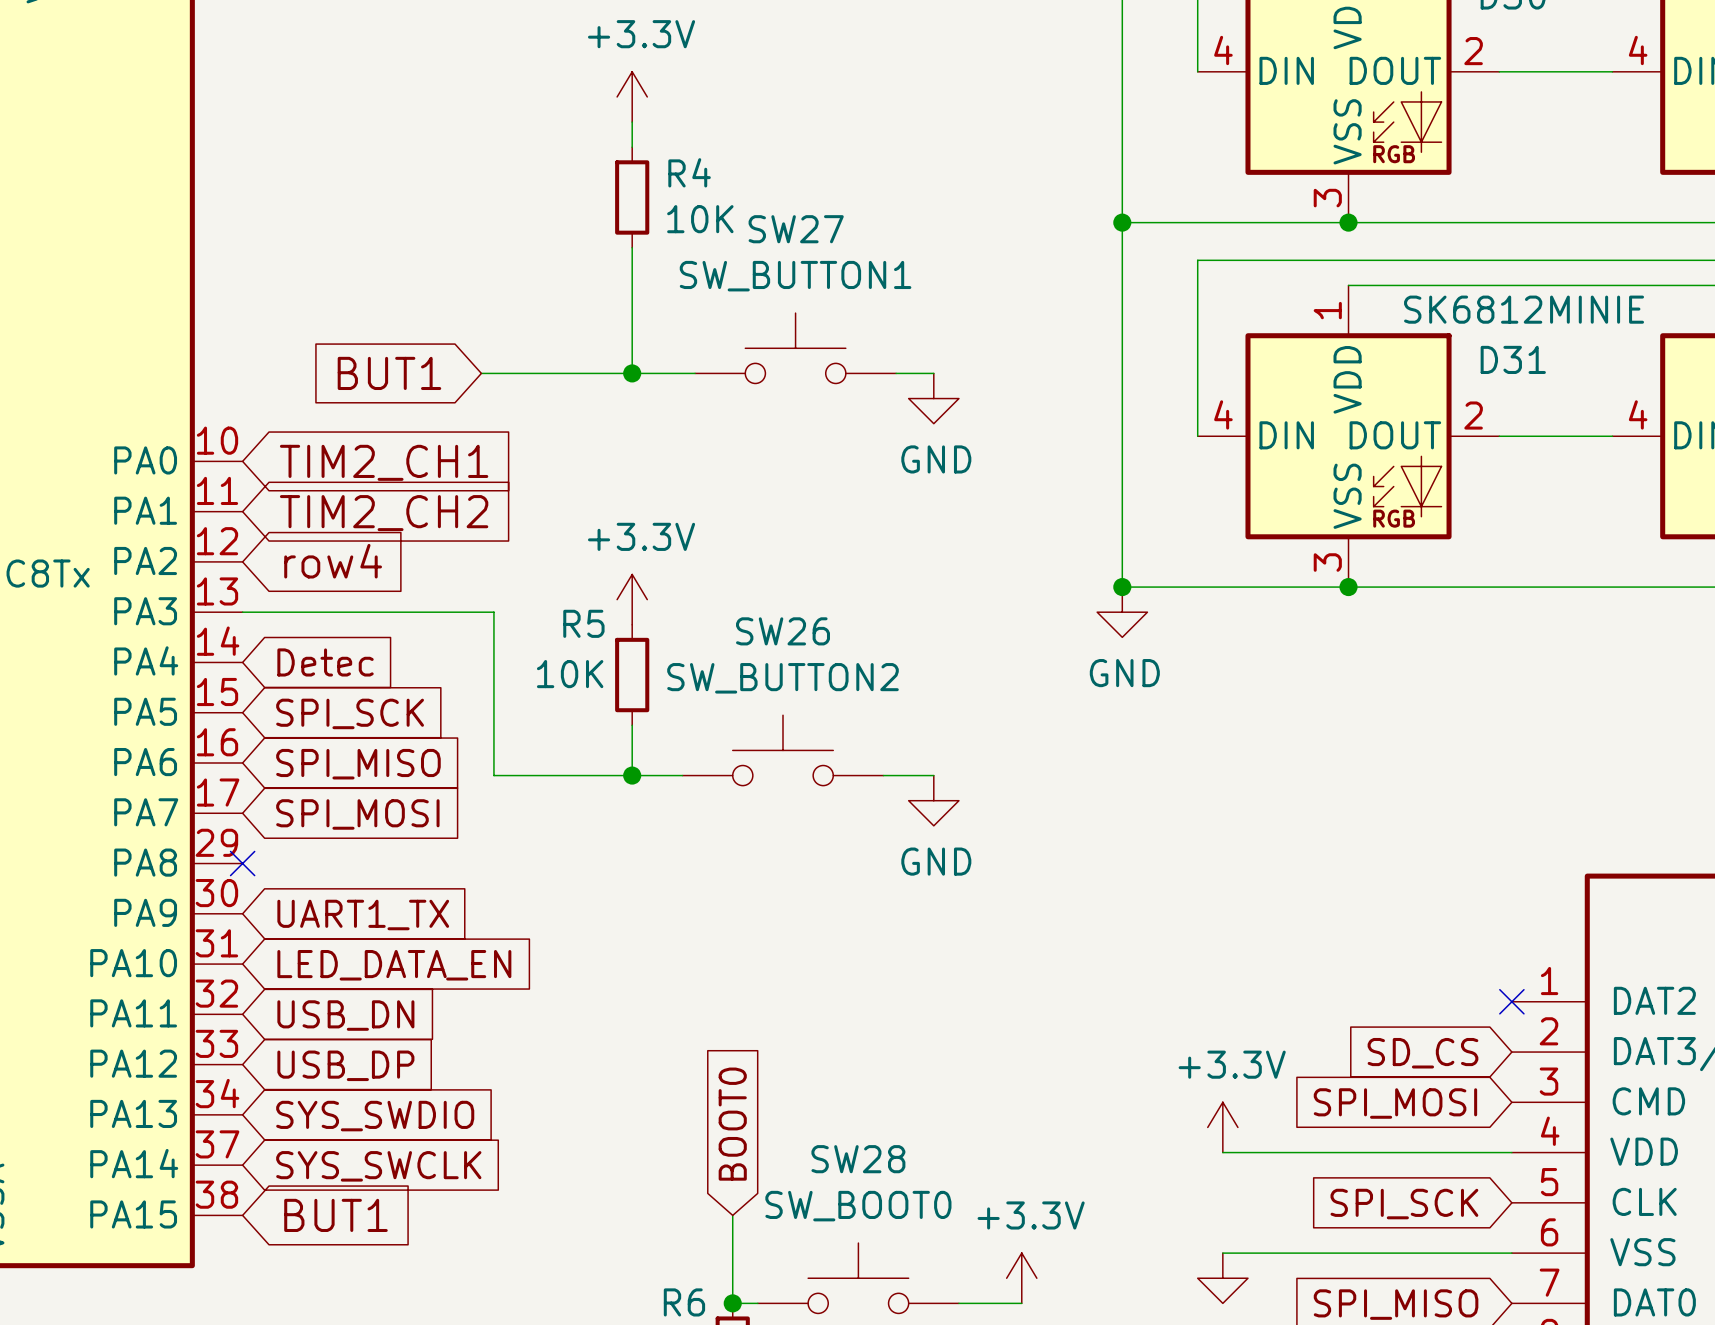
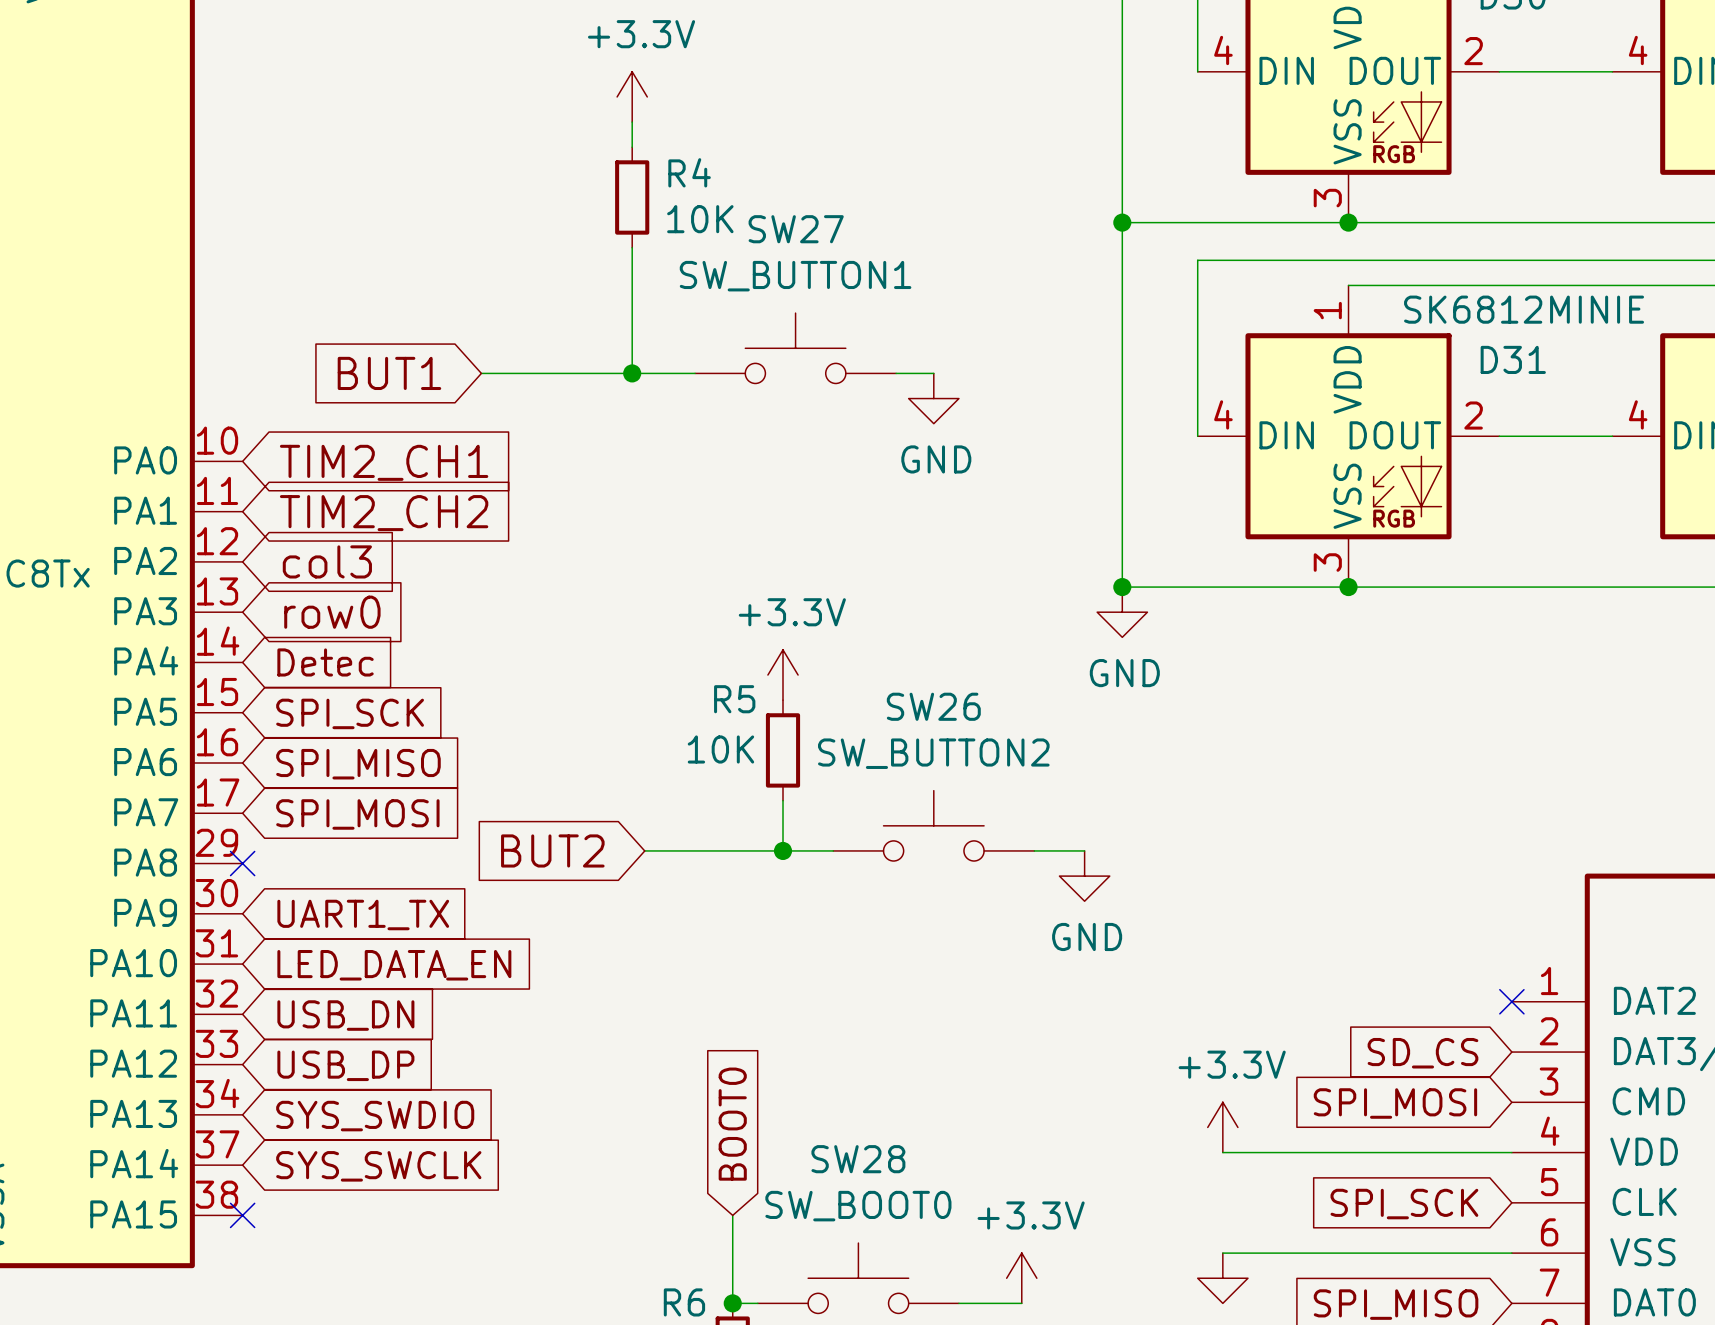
global label: row4 (333, 561) -> col3 (327, 561)
power symbol position: +3.3V (632, 599) -> +3.3V (783, 675)
wire: (242, 612) (493, 612) (493, 775) (682, 775) -> none
global label: none -> row0 (332, 612)
R5 position: (632, 675) -> (783, 750)
wire: (632, 725) (632, 775) -> (783, 800) (783, 850)
SW26 position: (783, 750) -> (933, 825)
junction: (632, 775) -> none
wire: (883, 775) (933, 775) -> (1034, 850) (1084, 850)
power symbol position: GND (933, 800) -> GND (1084, 876)
global label: none -> BUT2 (552, 850)
wire: none -> (644, 850) (833, 850)
junction: none -> (783, 850)
no-connect mark: none -> (242, 1215)
global label: BUT1 (335, 1215) -> none

